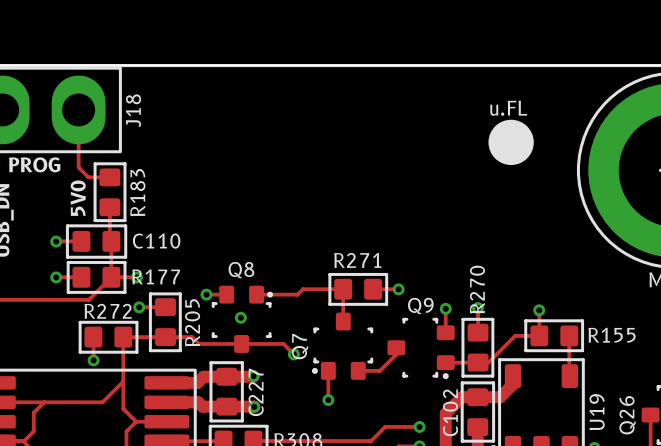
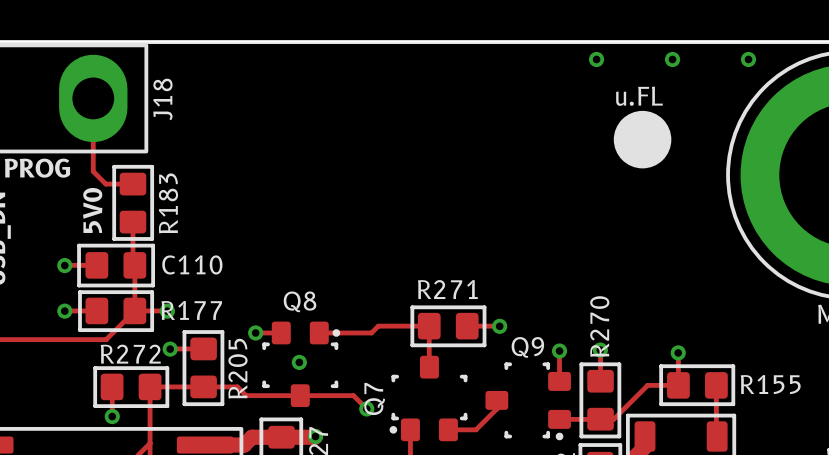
via: none -> (596, 59)
via: none -> (672, 59)
via: none -> (748, 59)

